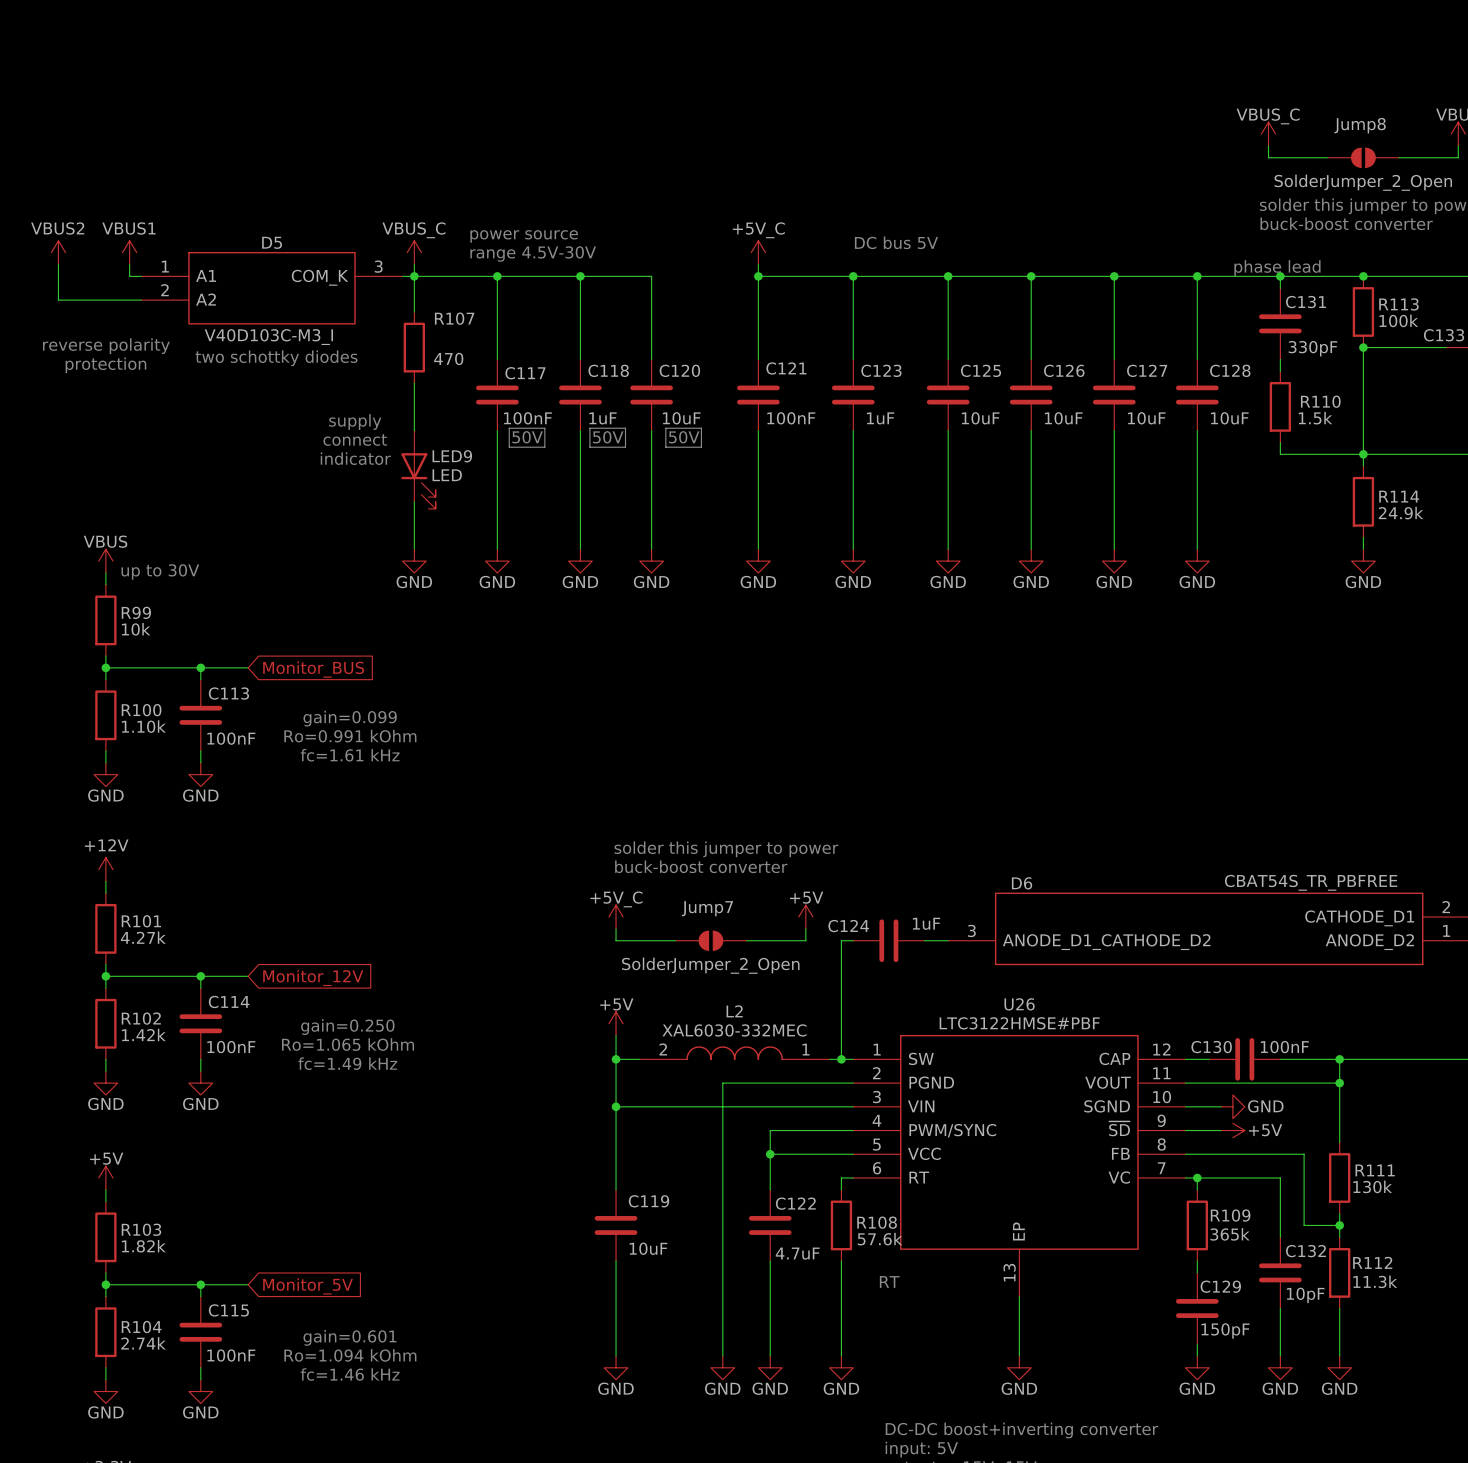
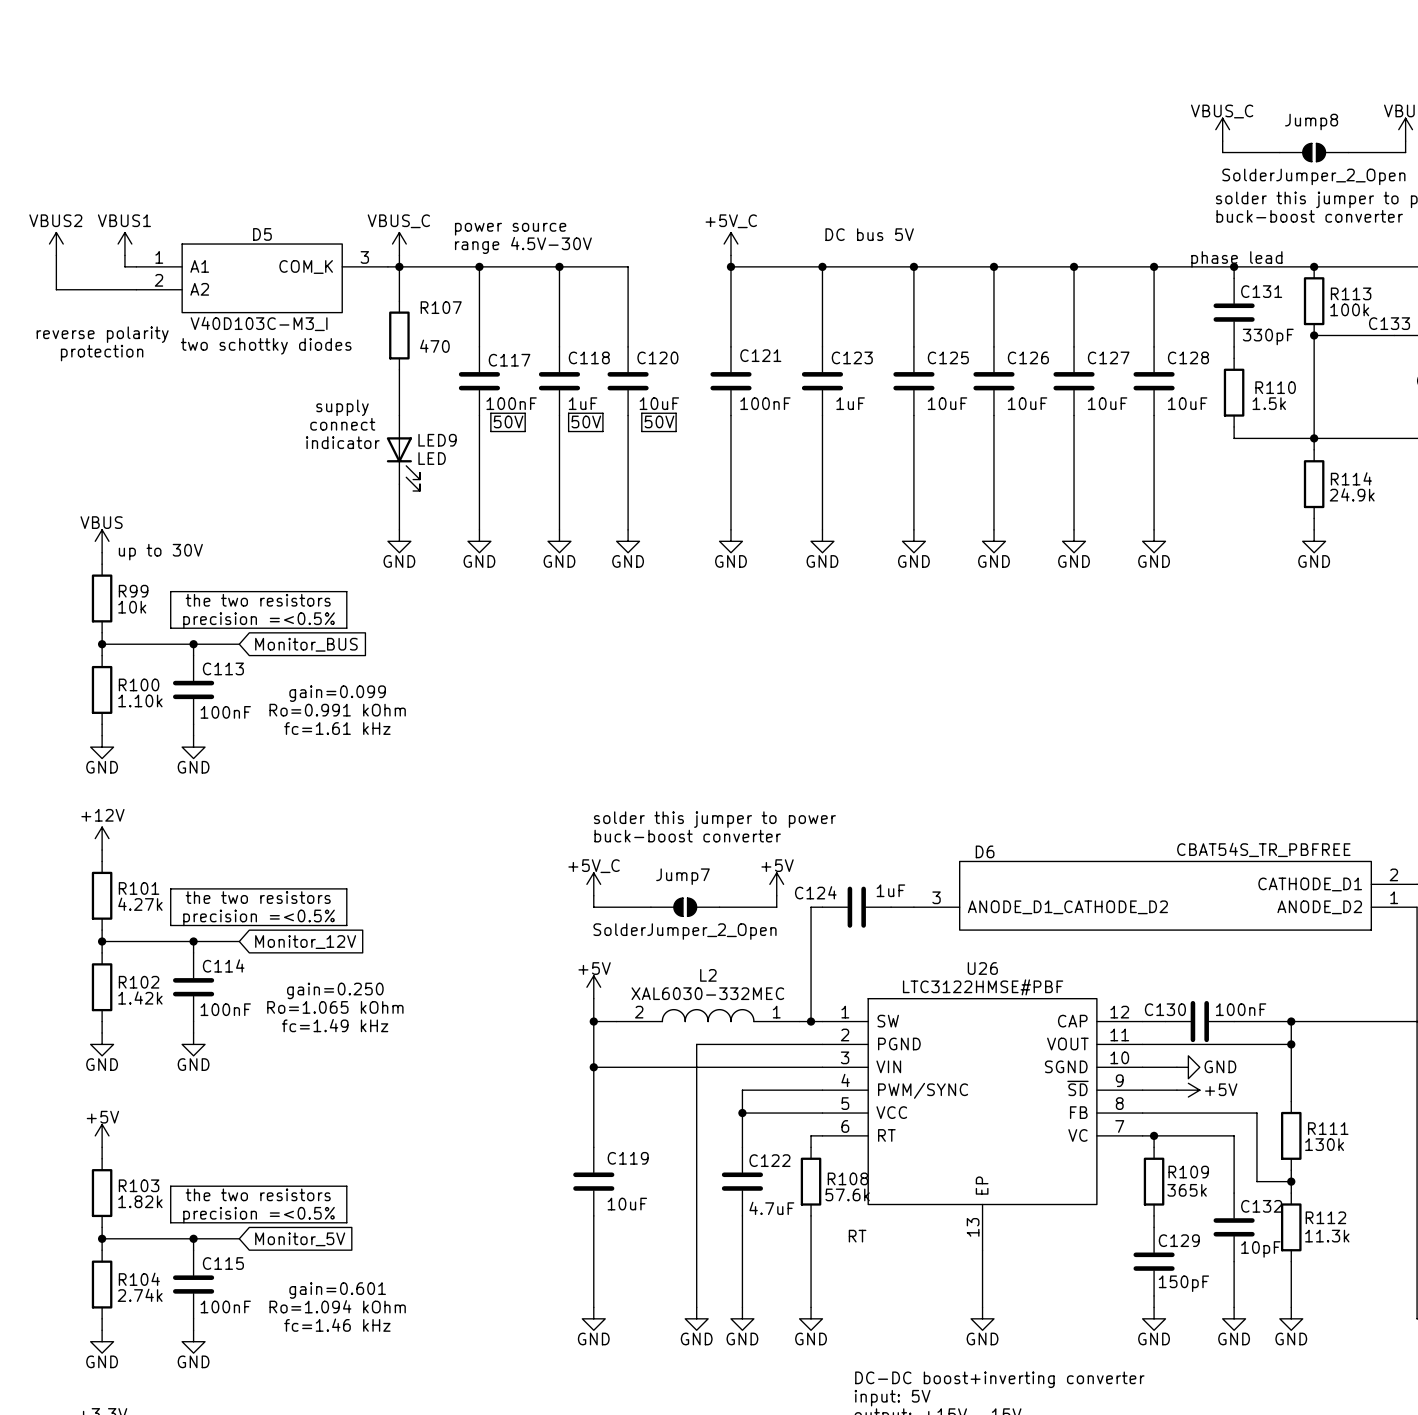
line: none -> (170, 591) (170, 628) (346, 628) (346, 591) (170, 591)
text: none -> the two resistors (258, 600)
text: none -> precision =<0.5% (259, 620)
line: none -> (170, 888) (170, 925) (346, 925) (346, 888) (170, 888)
text: none -> the two resistors (258, 897)
text: none -> precision =<0.5% (259, 917)
line: none -> (170, 1186) (346, 1186) (346, 1222) (170, 1222) (170, 1186)
text: none -> the two resistors (258, 1194)
text: none -> precision =<0.5% (259, 1215)

